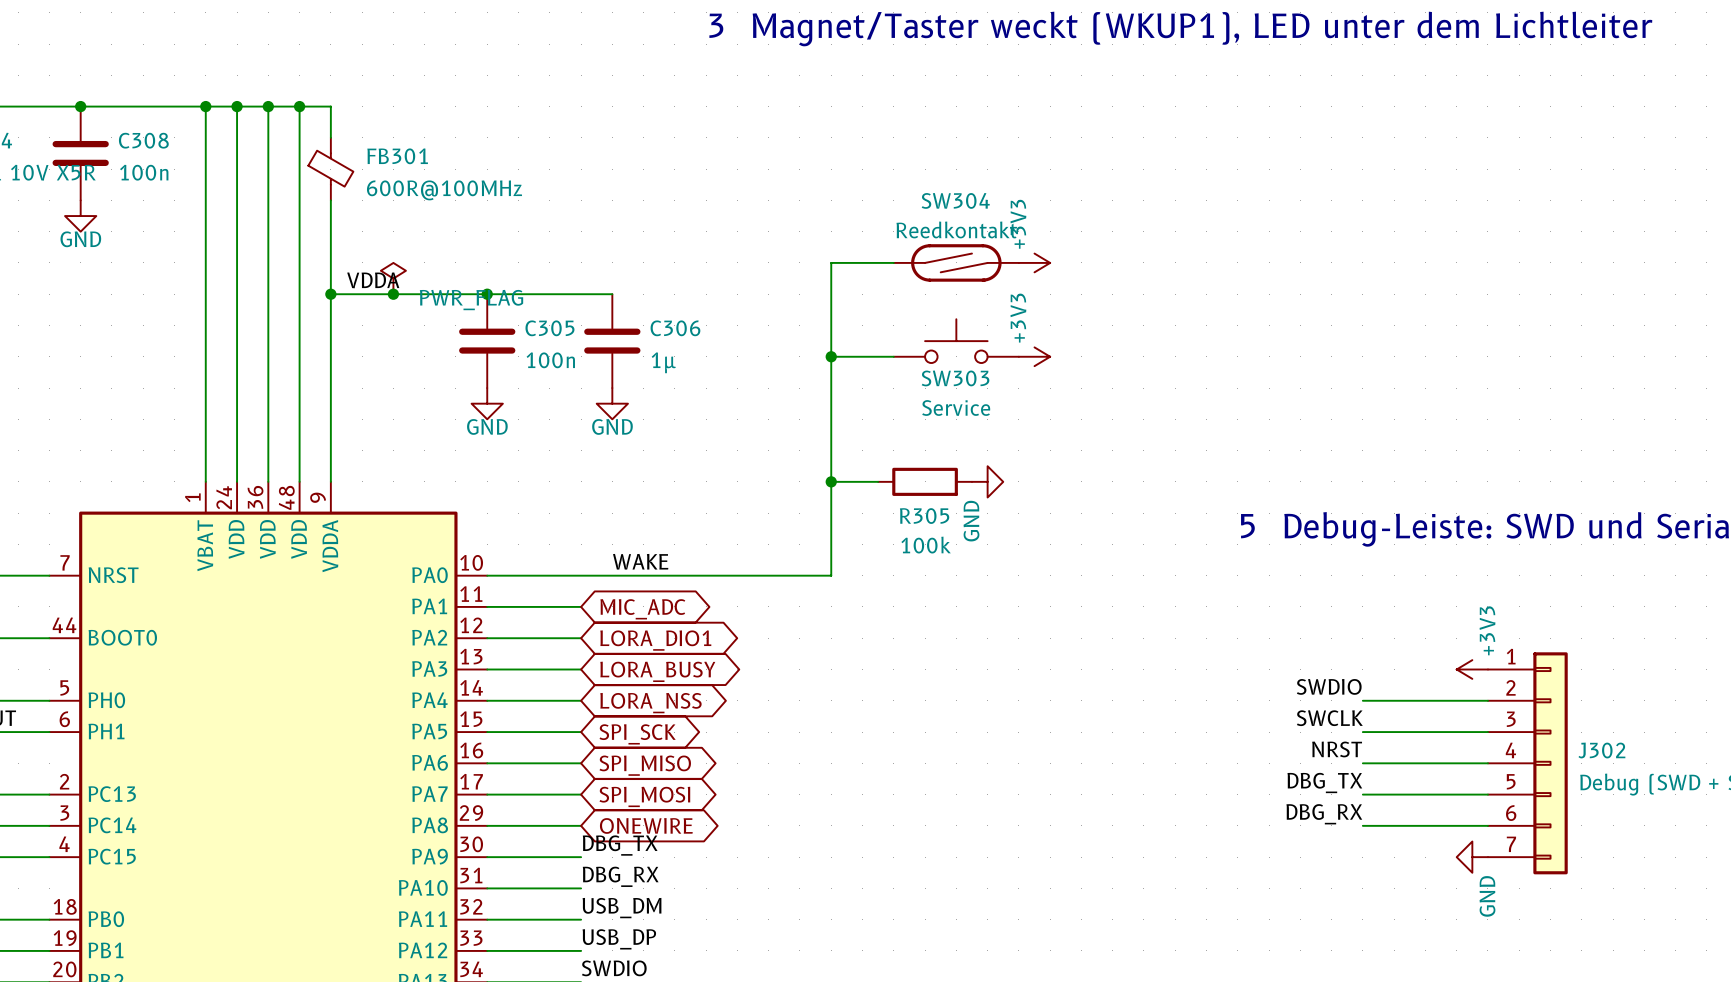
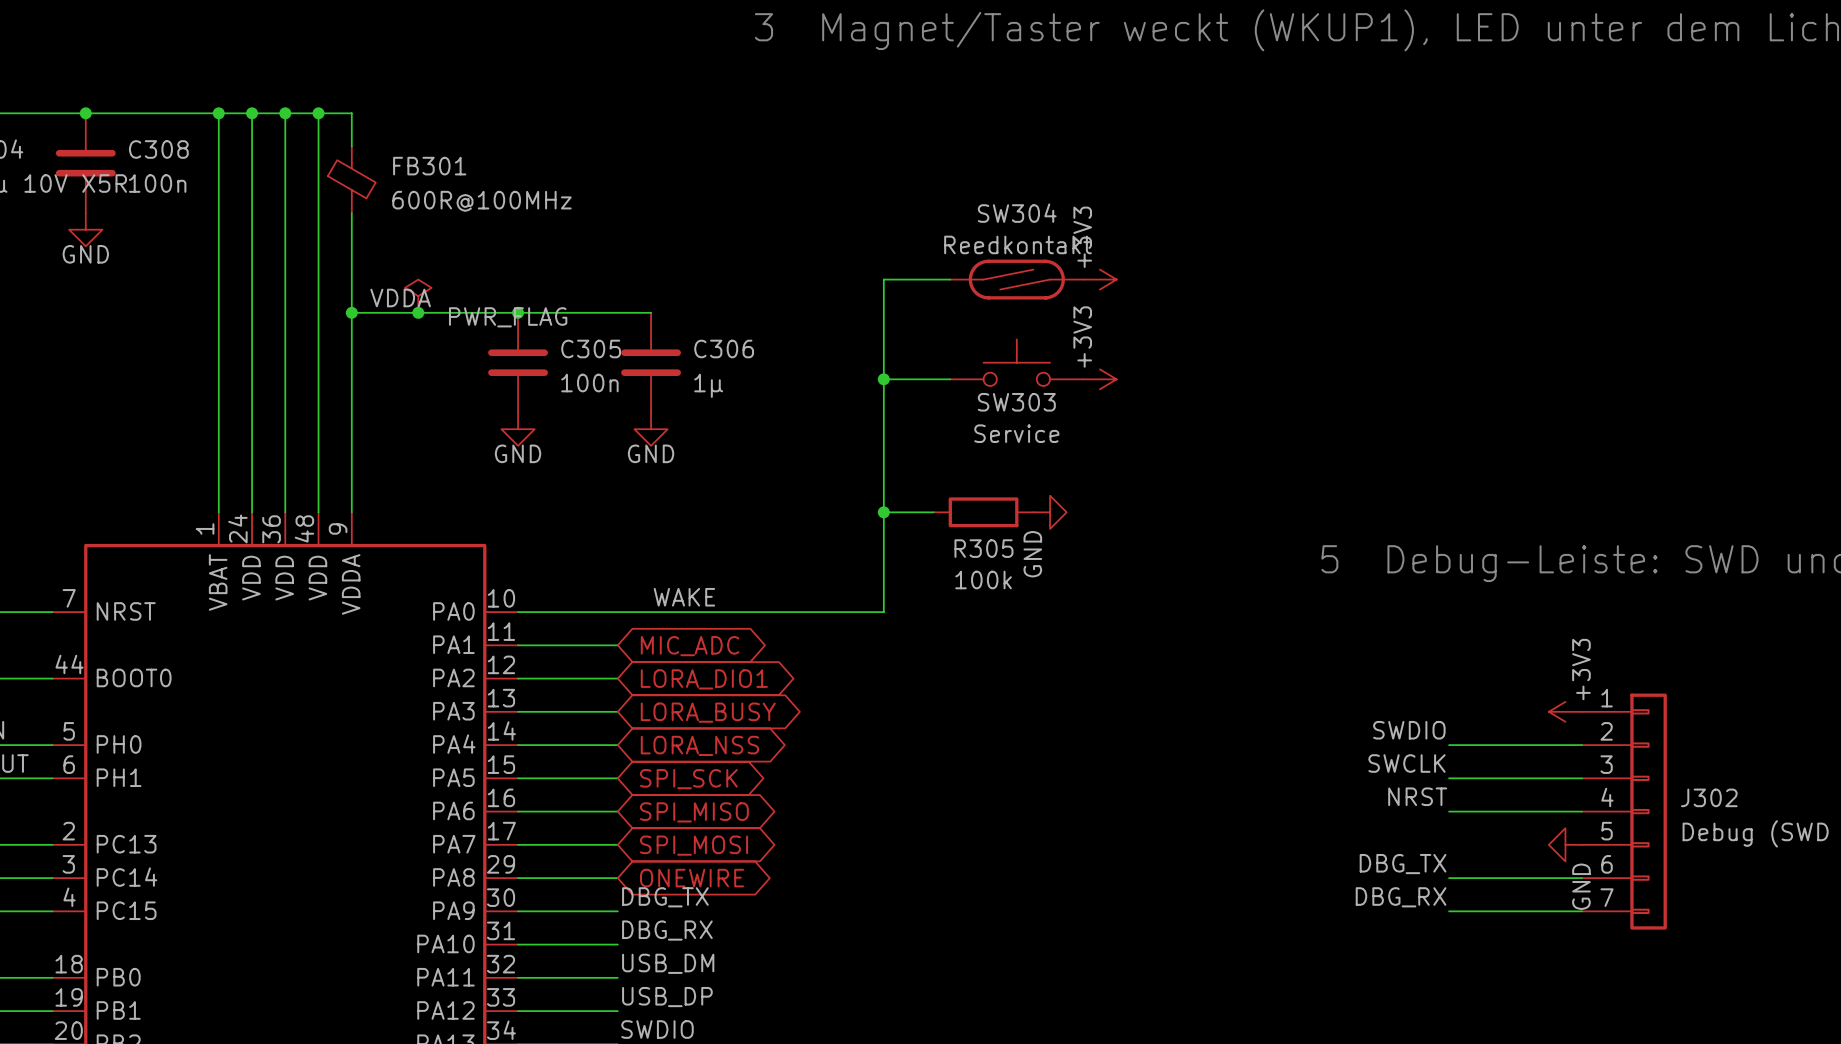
label: DBG_TX (1324, 782) -> none
wire: (1362, 794) (1487, 794) -> (1449, 911) (1582, 911)
label: DBG_RX (1324, 814) -> DBG_TX (1403, 864)
label: none -> DBG_RX (1401, 897)
power symbol position: GND (1472, 857) -> GND (1565, 844)

